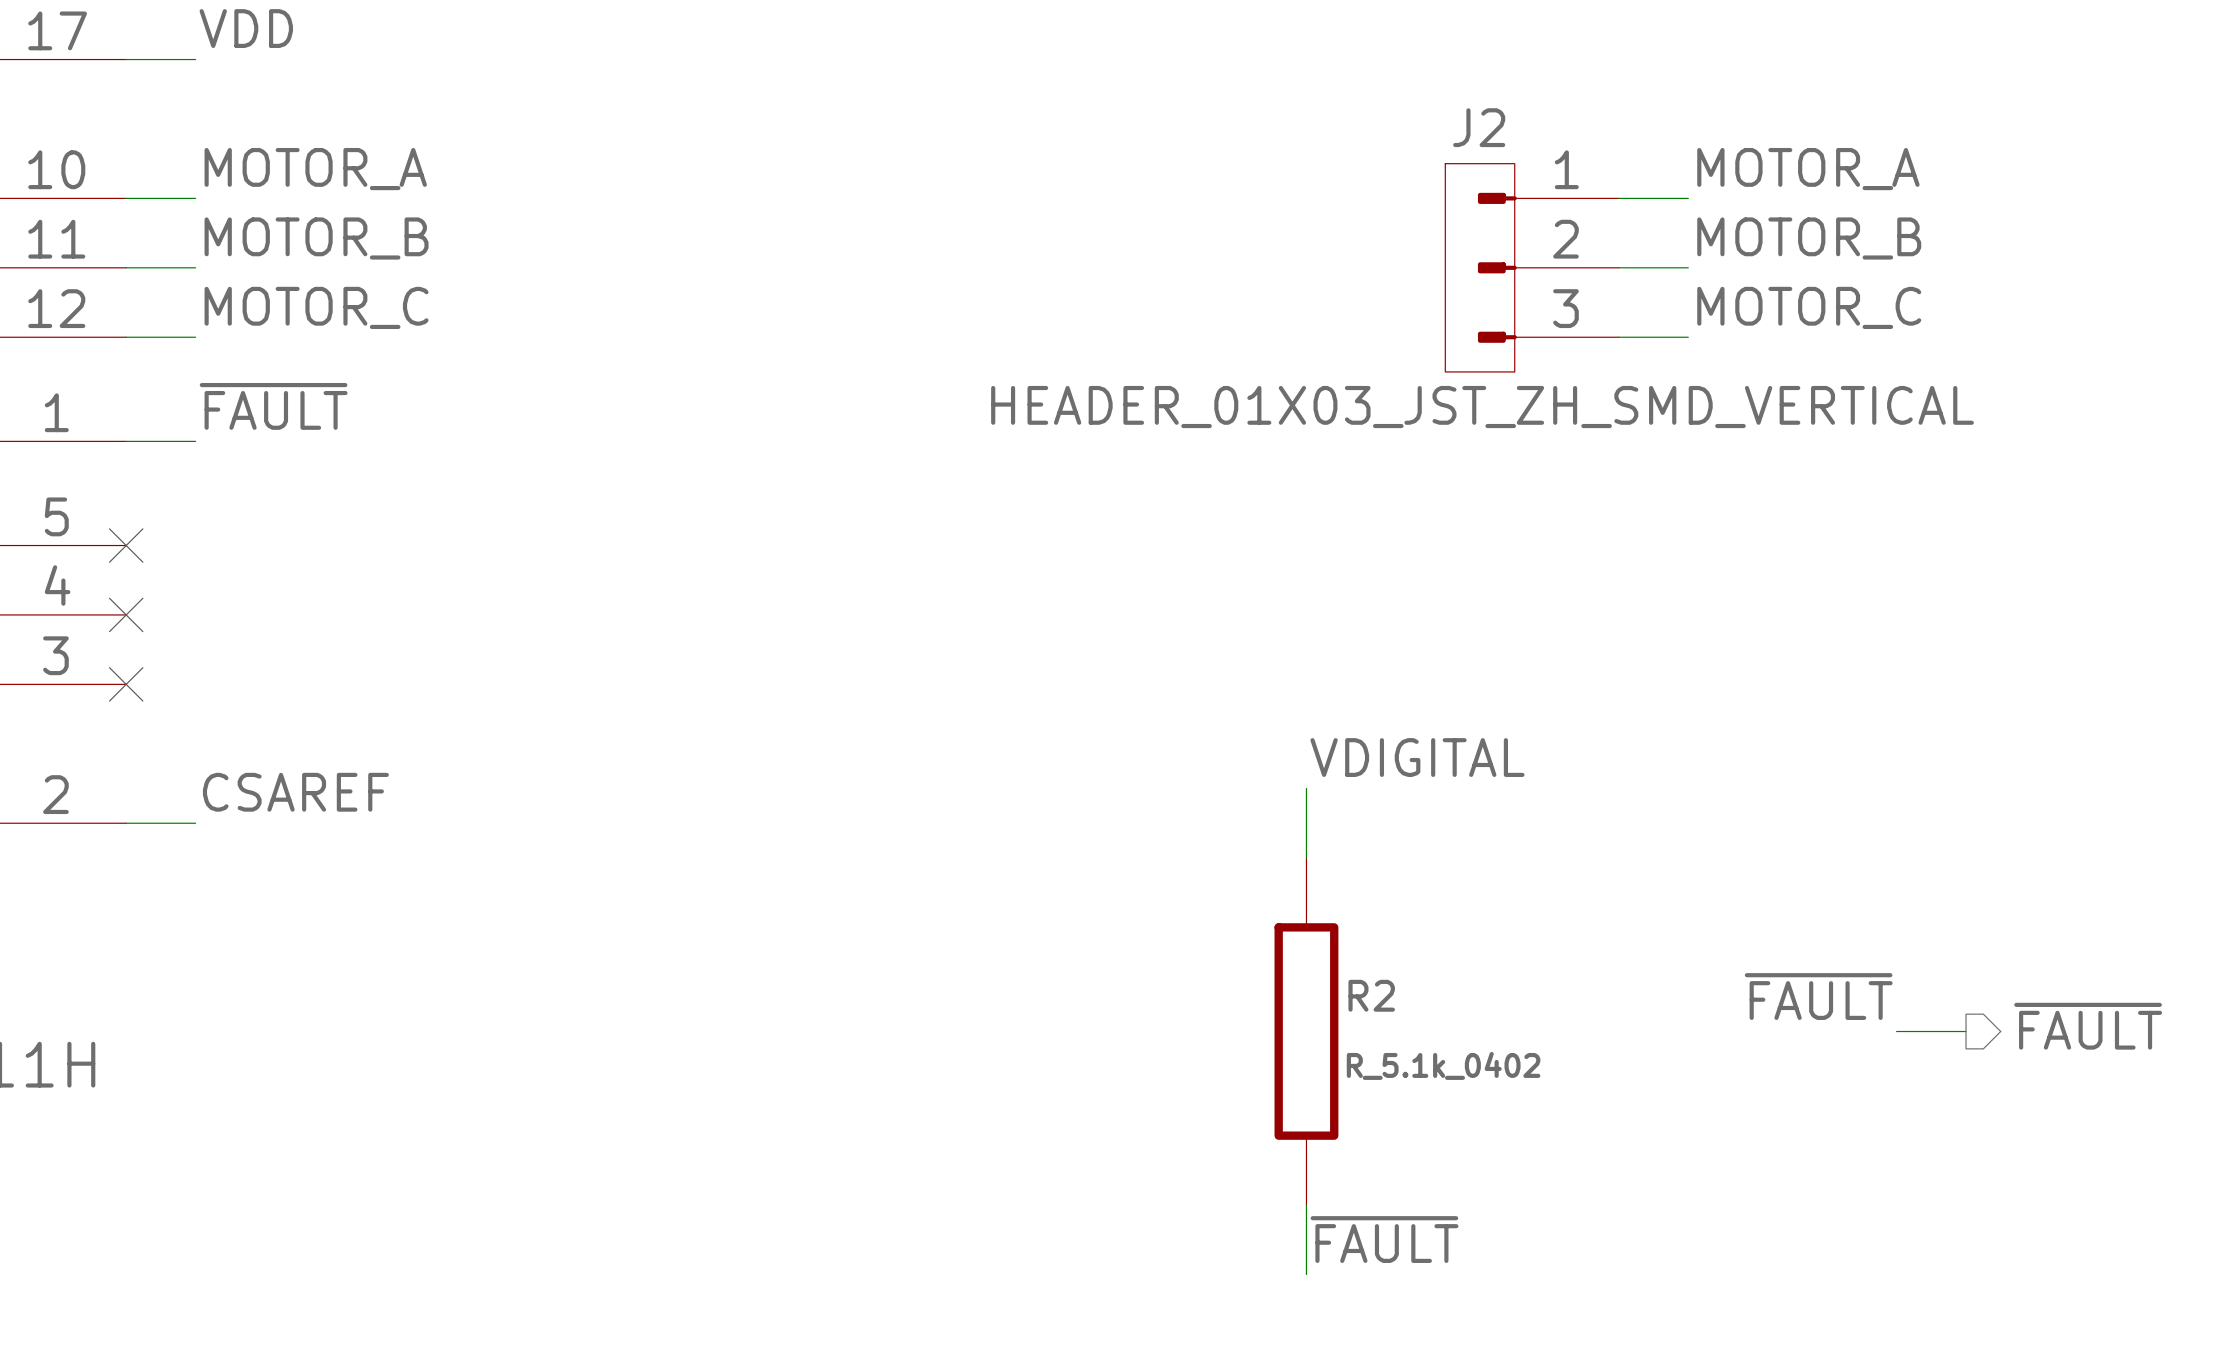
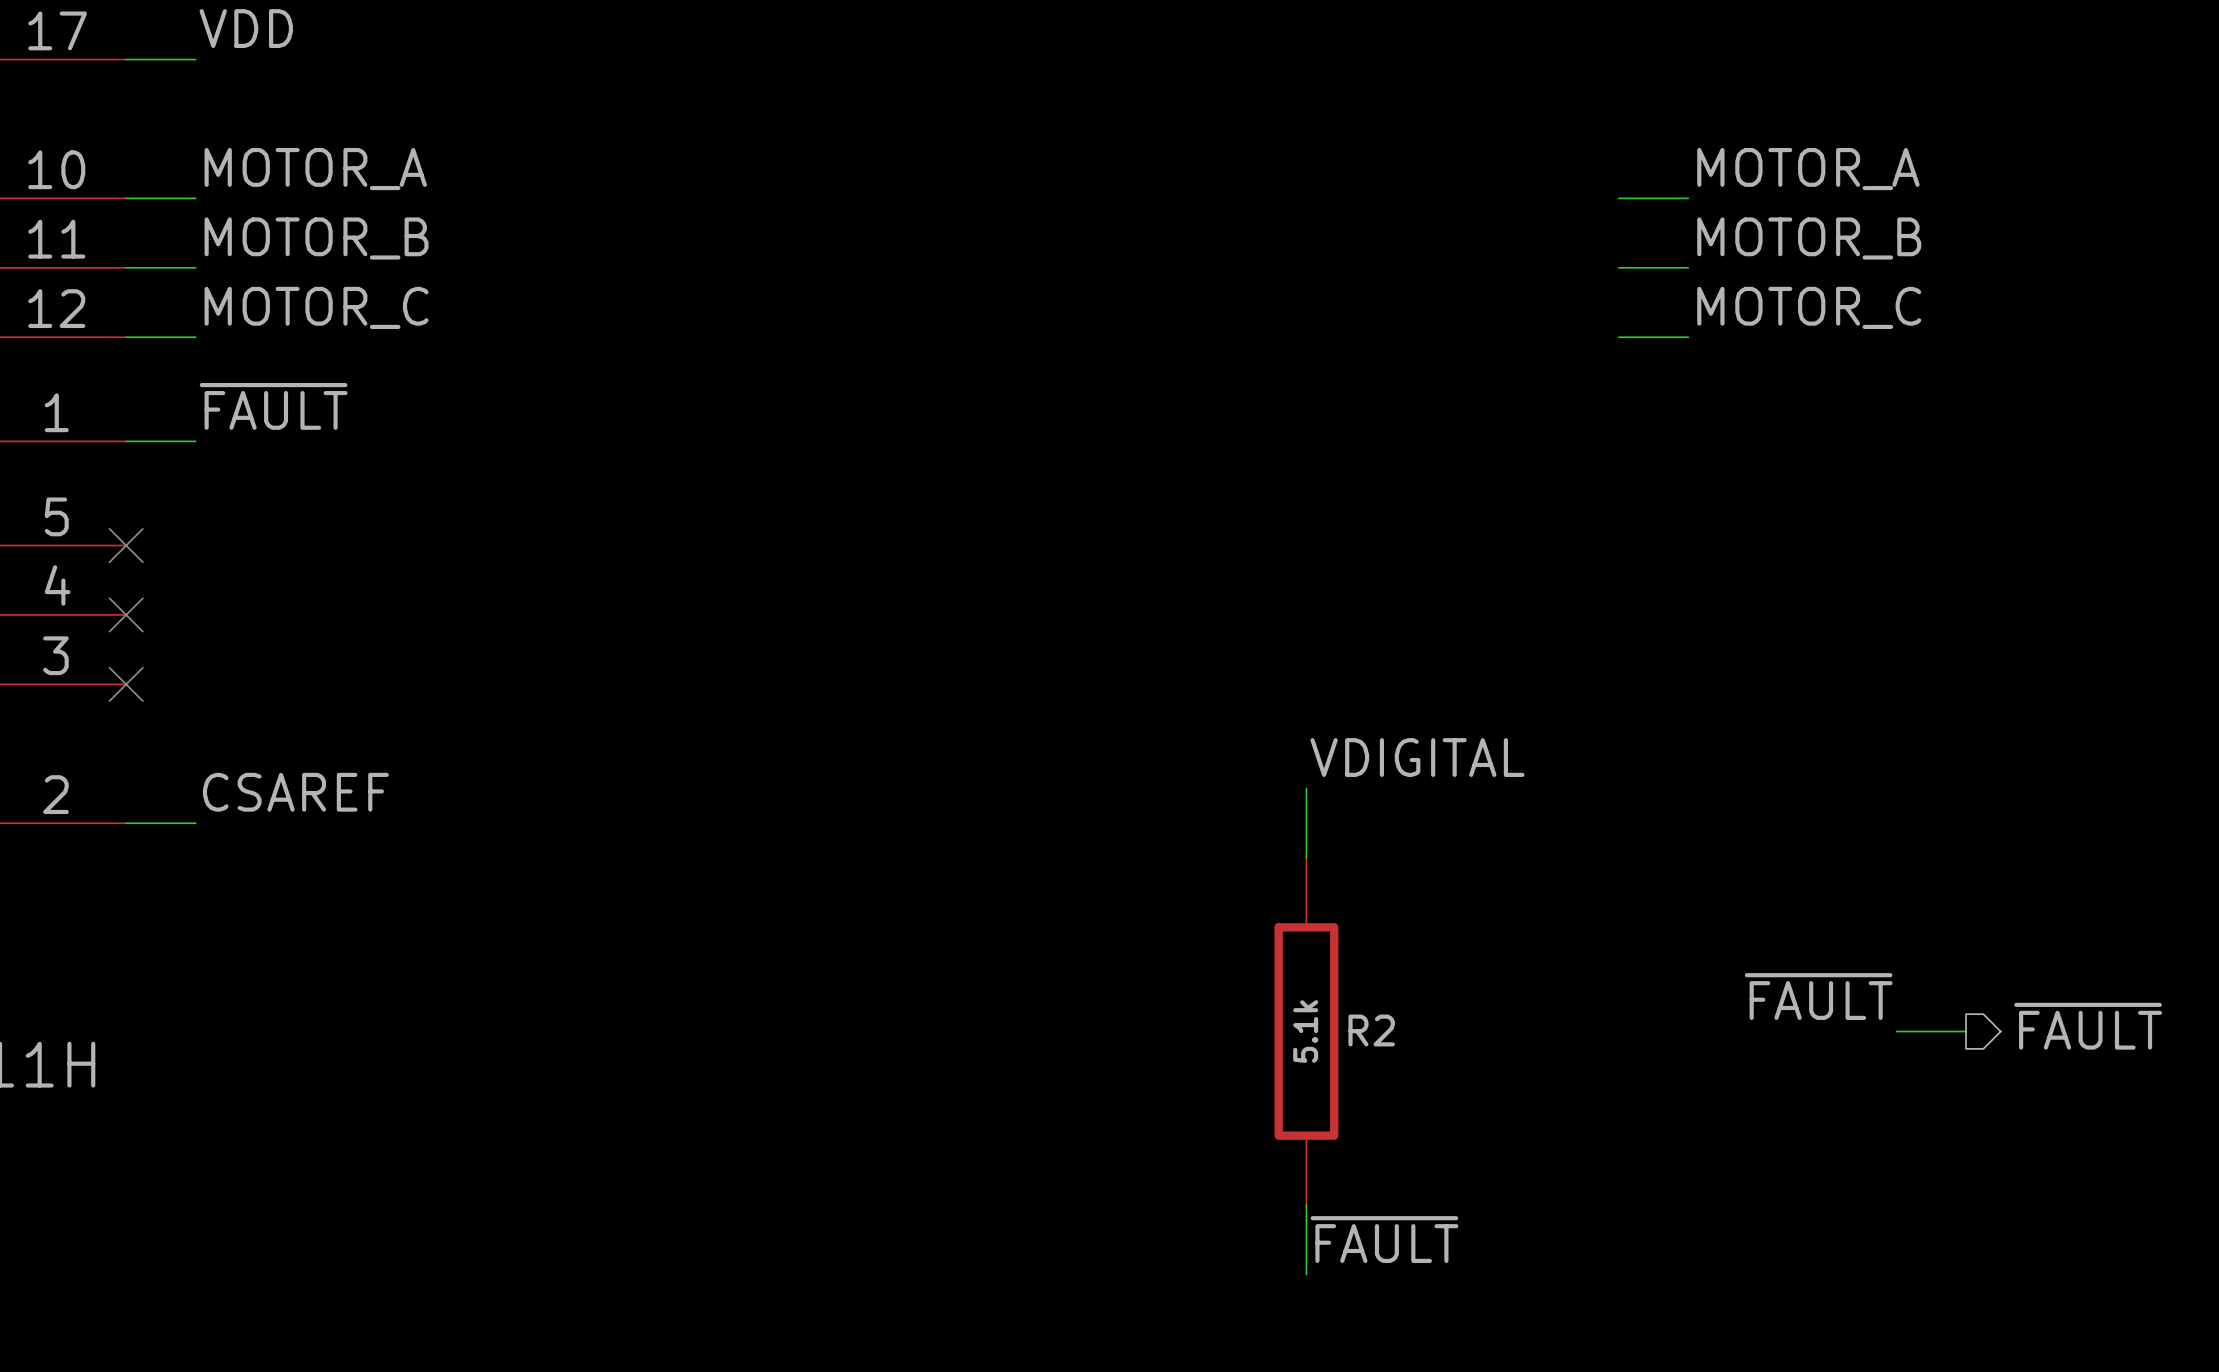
J2: HEADER_01X03_JST_ZH_SMD_VERTICAL (1532, 267) -> none
R2 name position: R2 (1371, 995) -> R2 (1371, 1030)
R2 value: R_5.1k_0402 (1443, 1065) -> 5.1k (1305, 1031)

